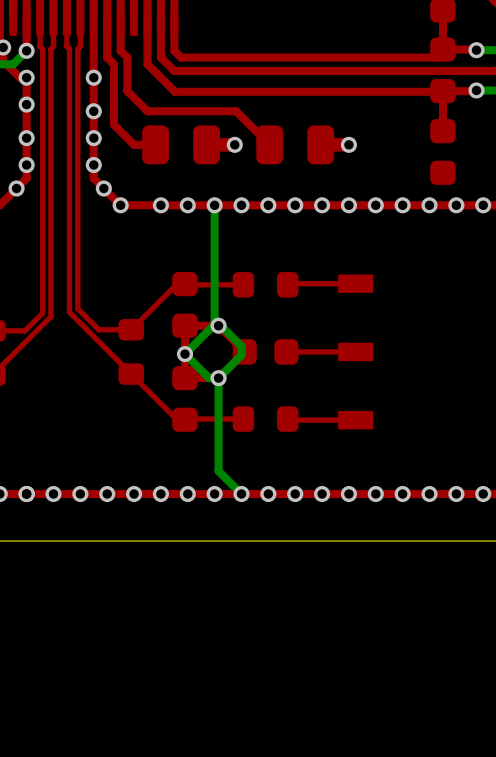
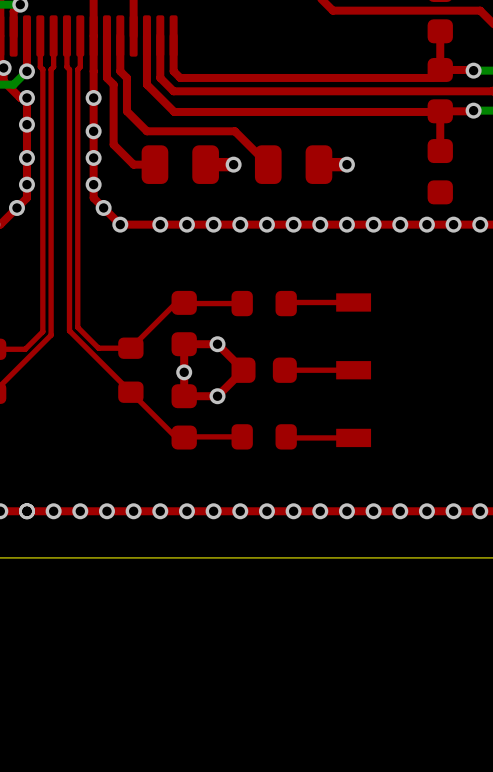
bottom track: (214, 205) (214, 321) (218, 325) -> none
bottom track: (218, 378) (209, 378) (185, 354) (213, 325) (220, 325) (241, 346) (241, 355) (218, 378) -> none
bottom track: (218, 378) (218, 471) (241, 494) -> none

